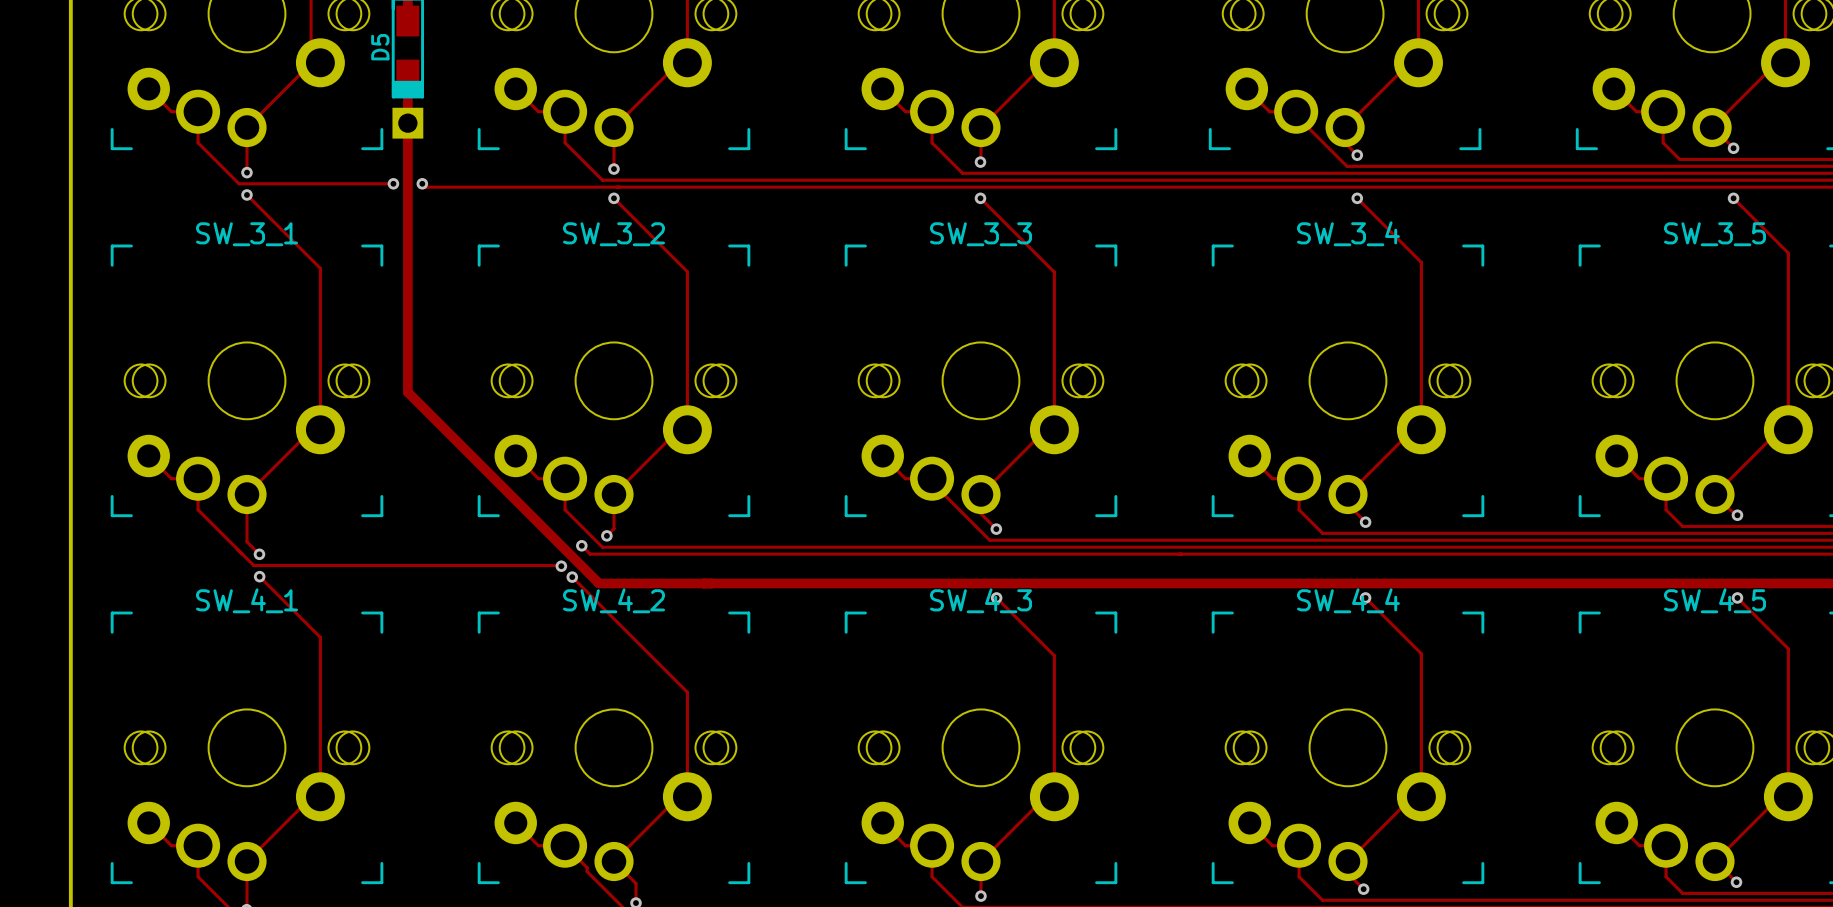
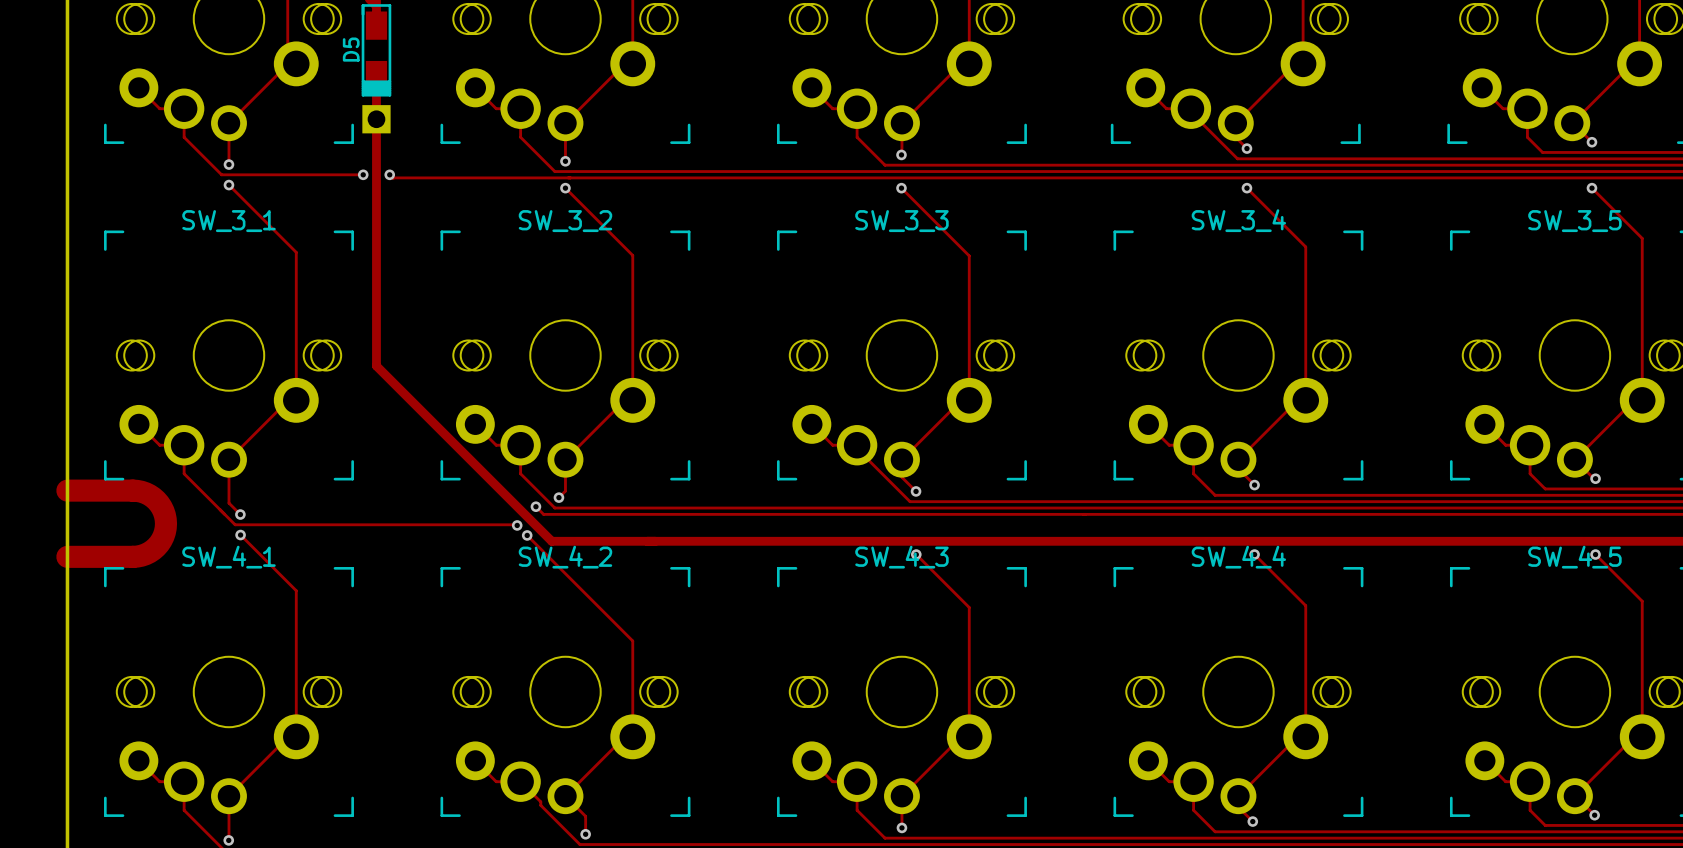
drawing: none -> [56, 479, 178, 568]

